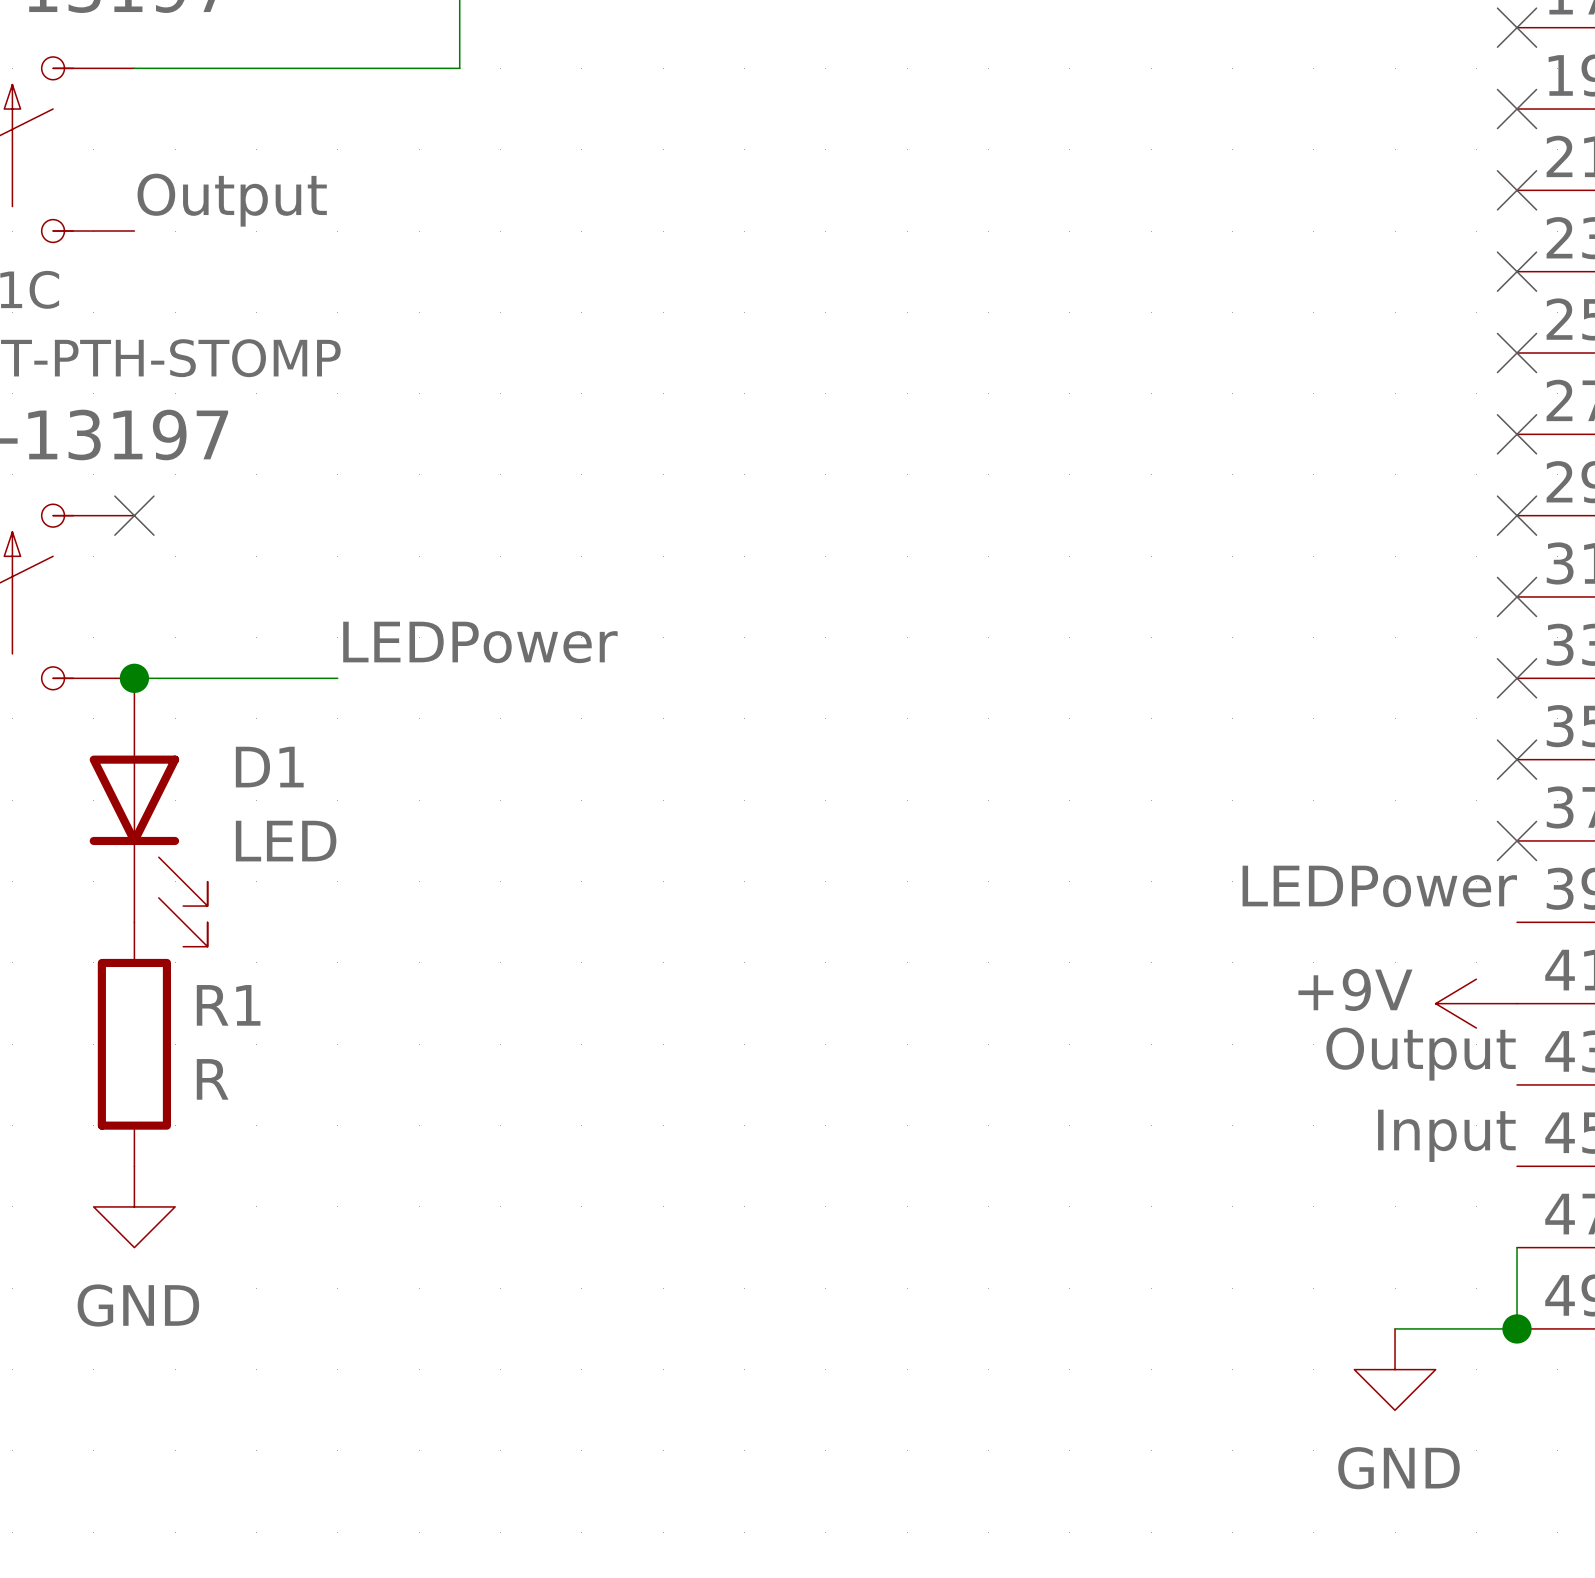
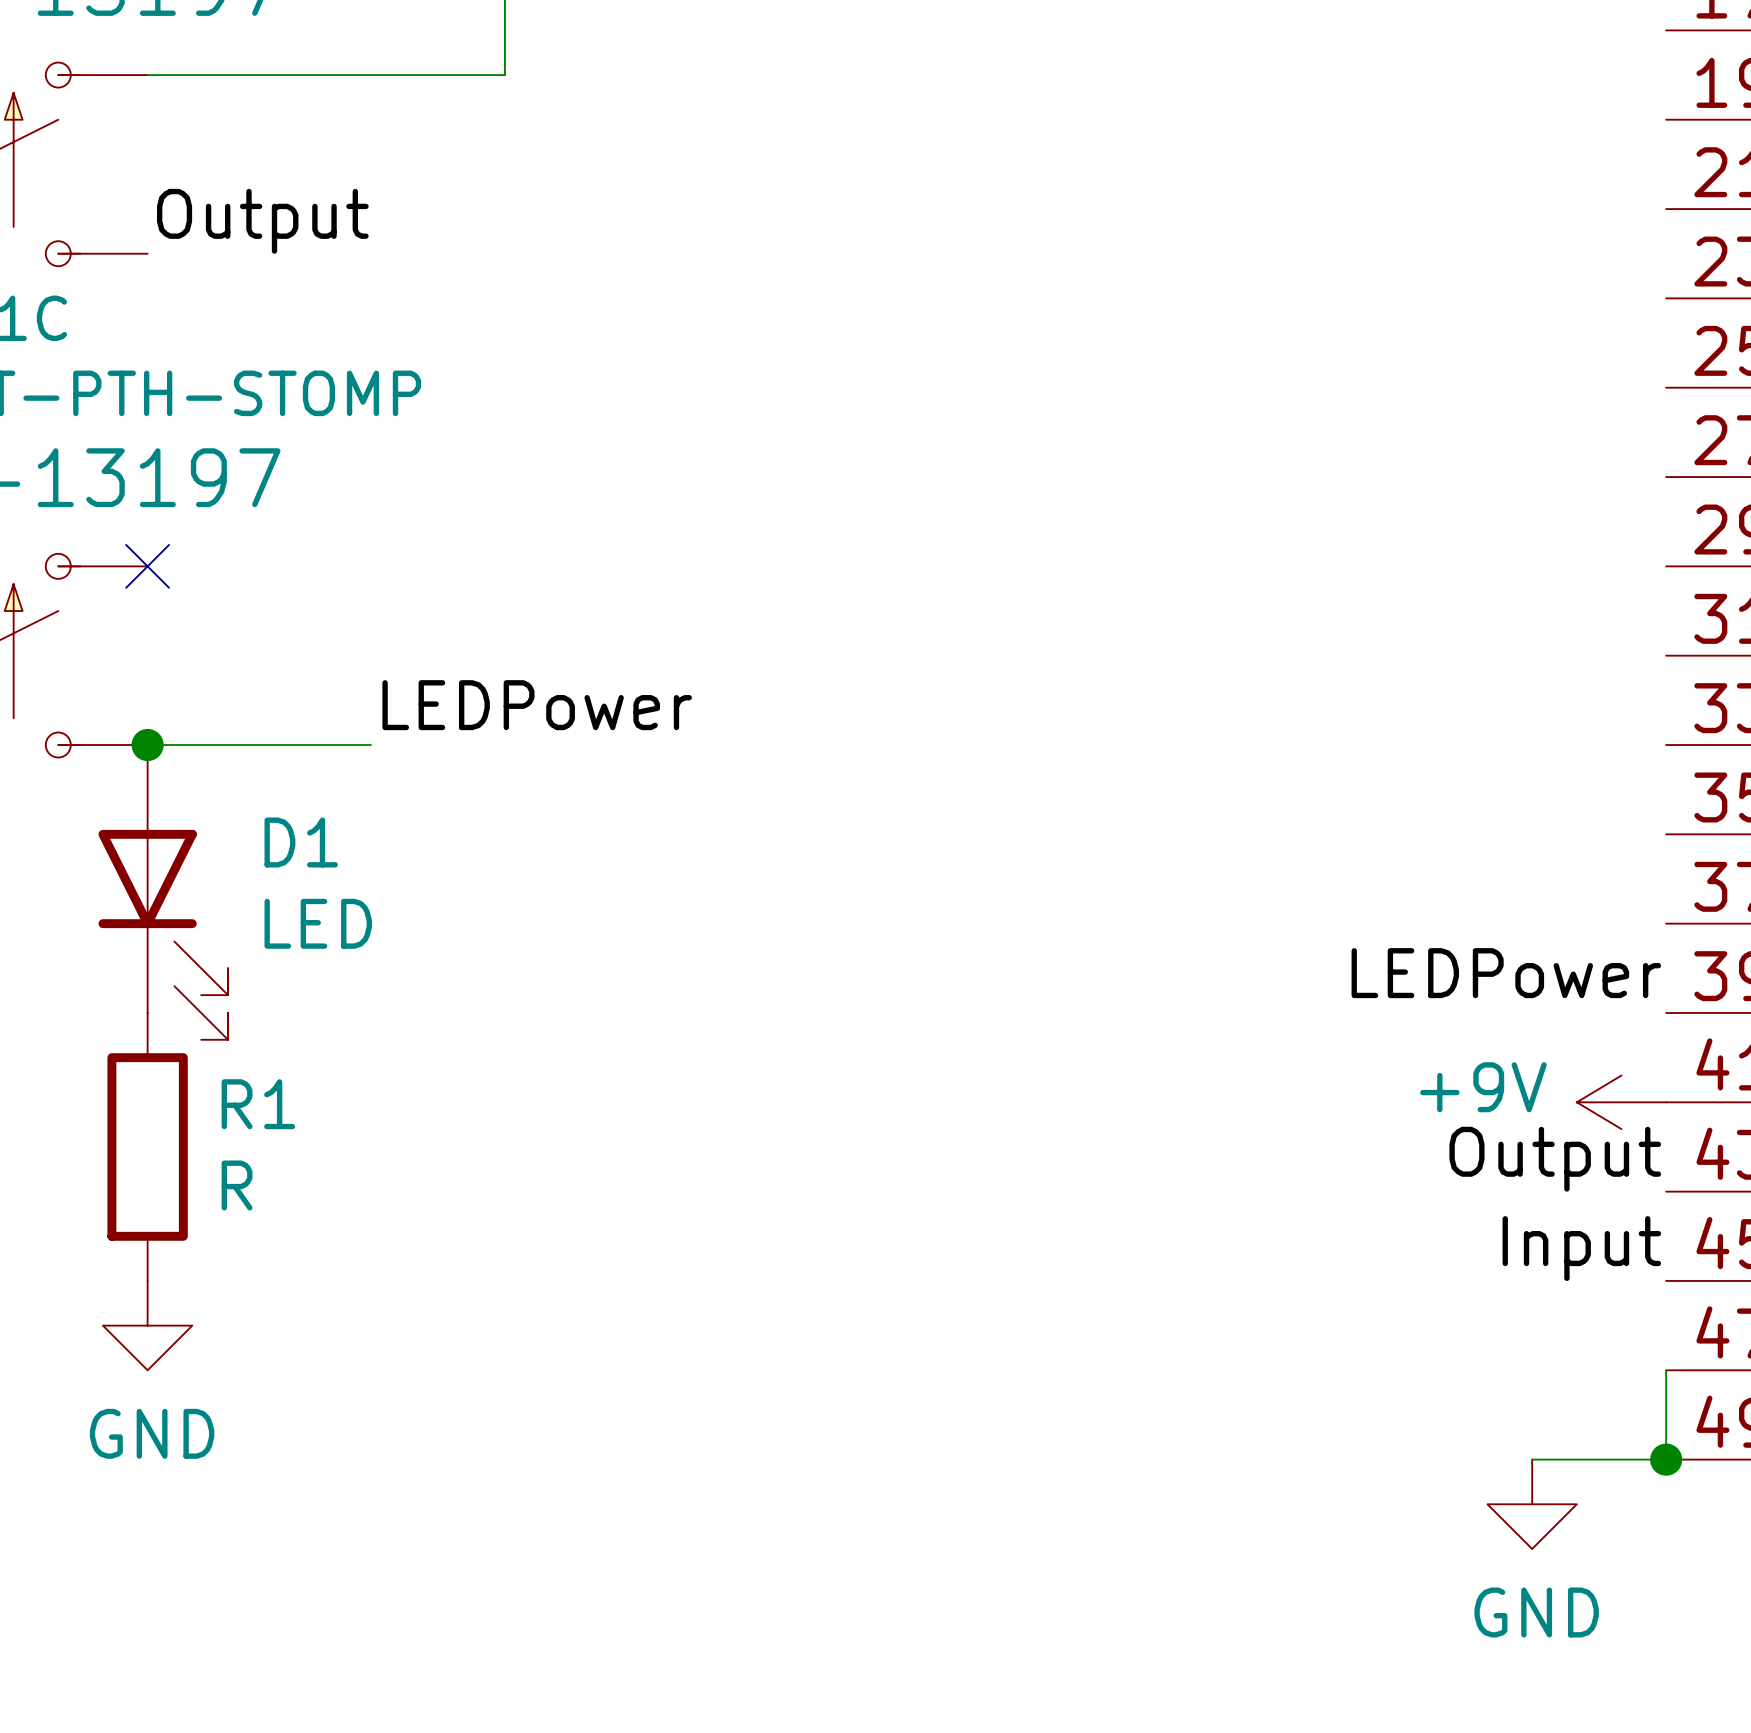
no-connect mark: (1517, 27) -> none
no-connect mark: (1517, 109) -> none
no-connect mark: (1517, 190) -> none
no-connect mark: (1517, 271) -> none
no-connect mark: (1517, 353) -> none
no-connect mark: (1517, 434) -> none
no-connect mark: (1517, 515) -> none
no-connect mark: (1517, 596) -> none
no-connect mark: (1517, 678) -> none
no-connect mark: (1517, 759) -> none
no-connect mark: (1517, 840) -> none

